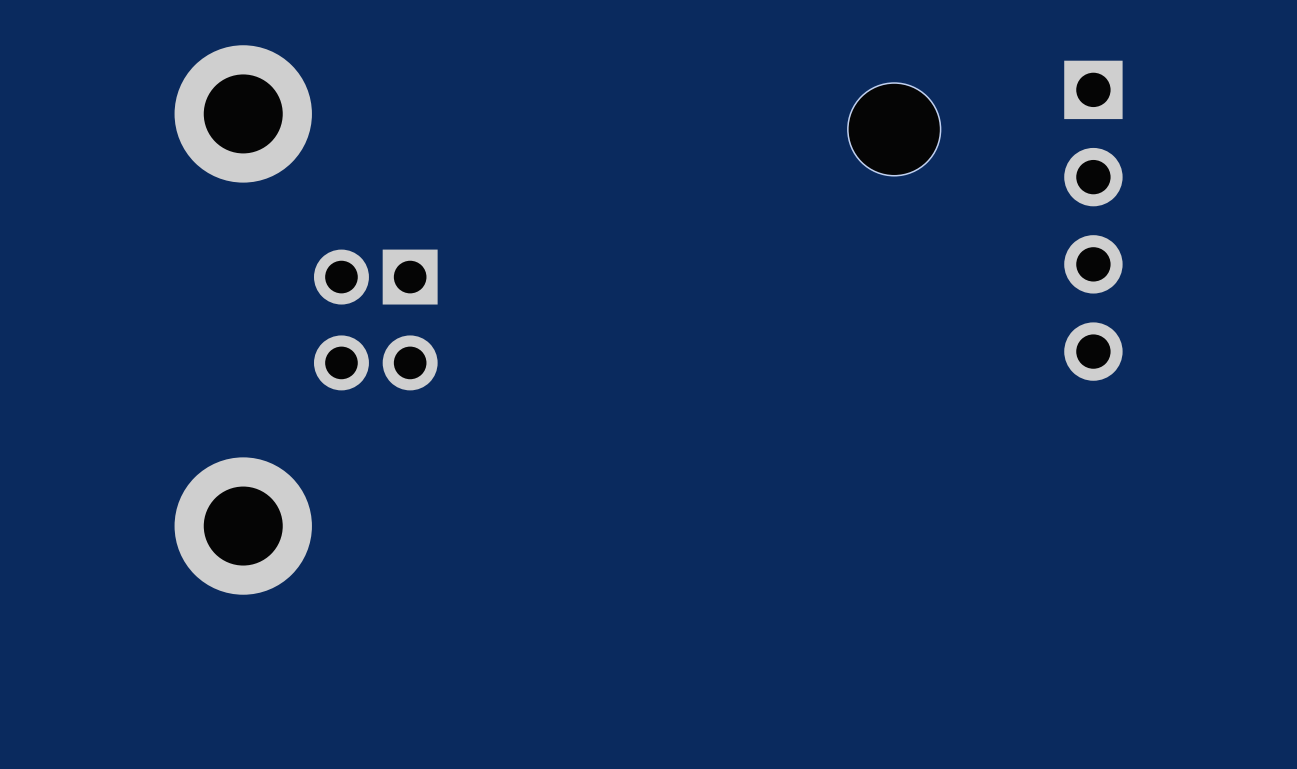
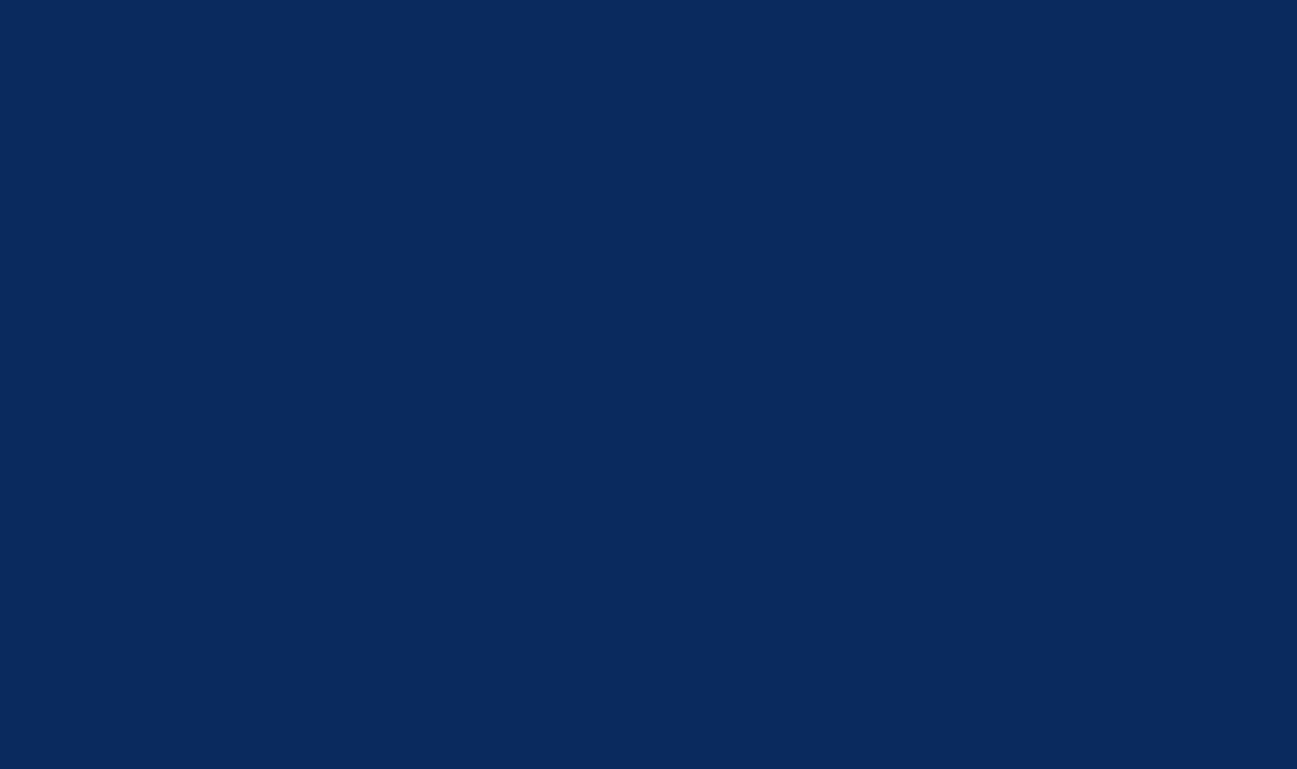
part: (894, 129) -> none
part: (1093, 220) -> none
part: (306, 319) -> none

